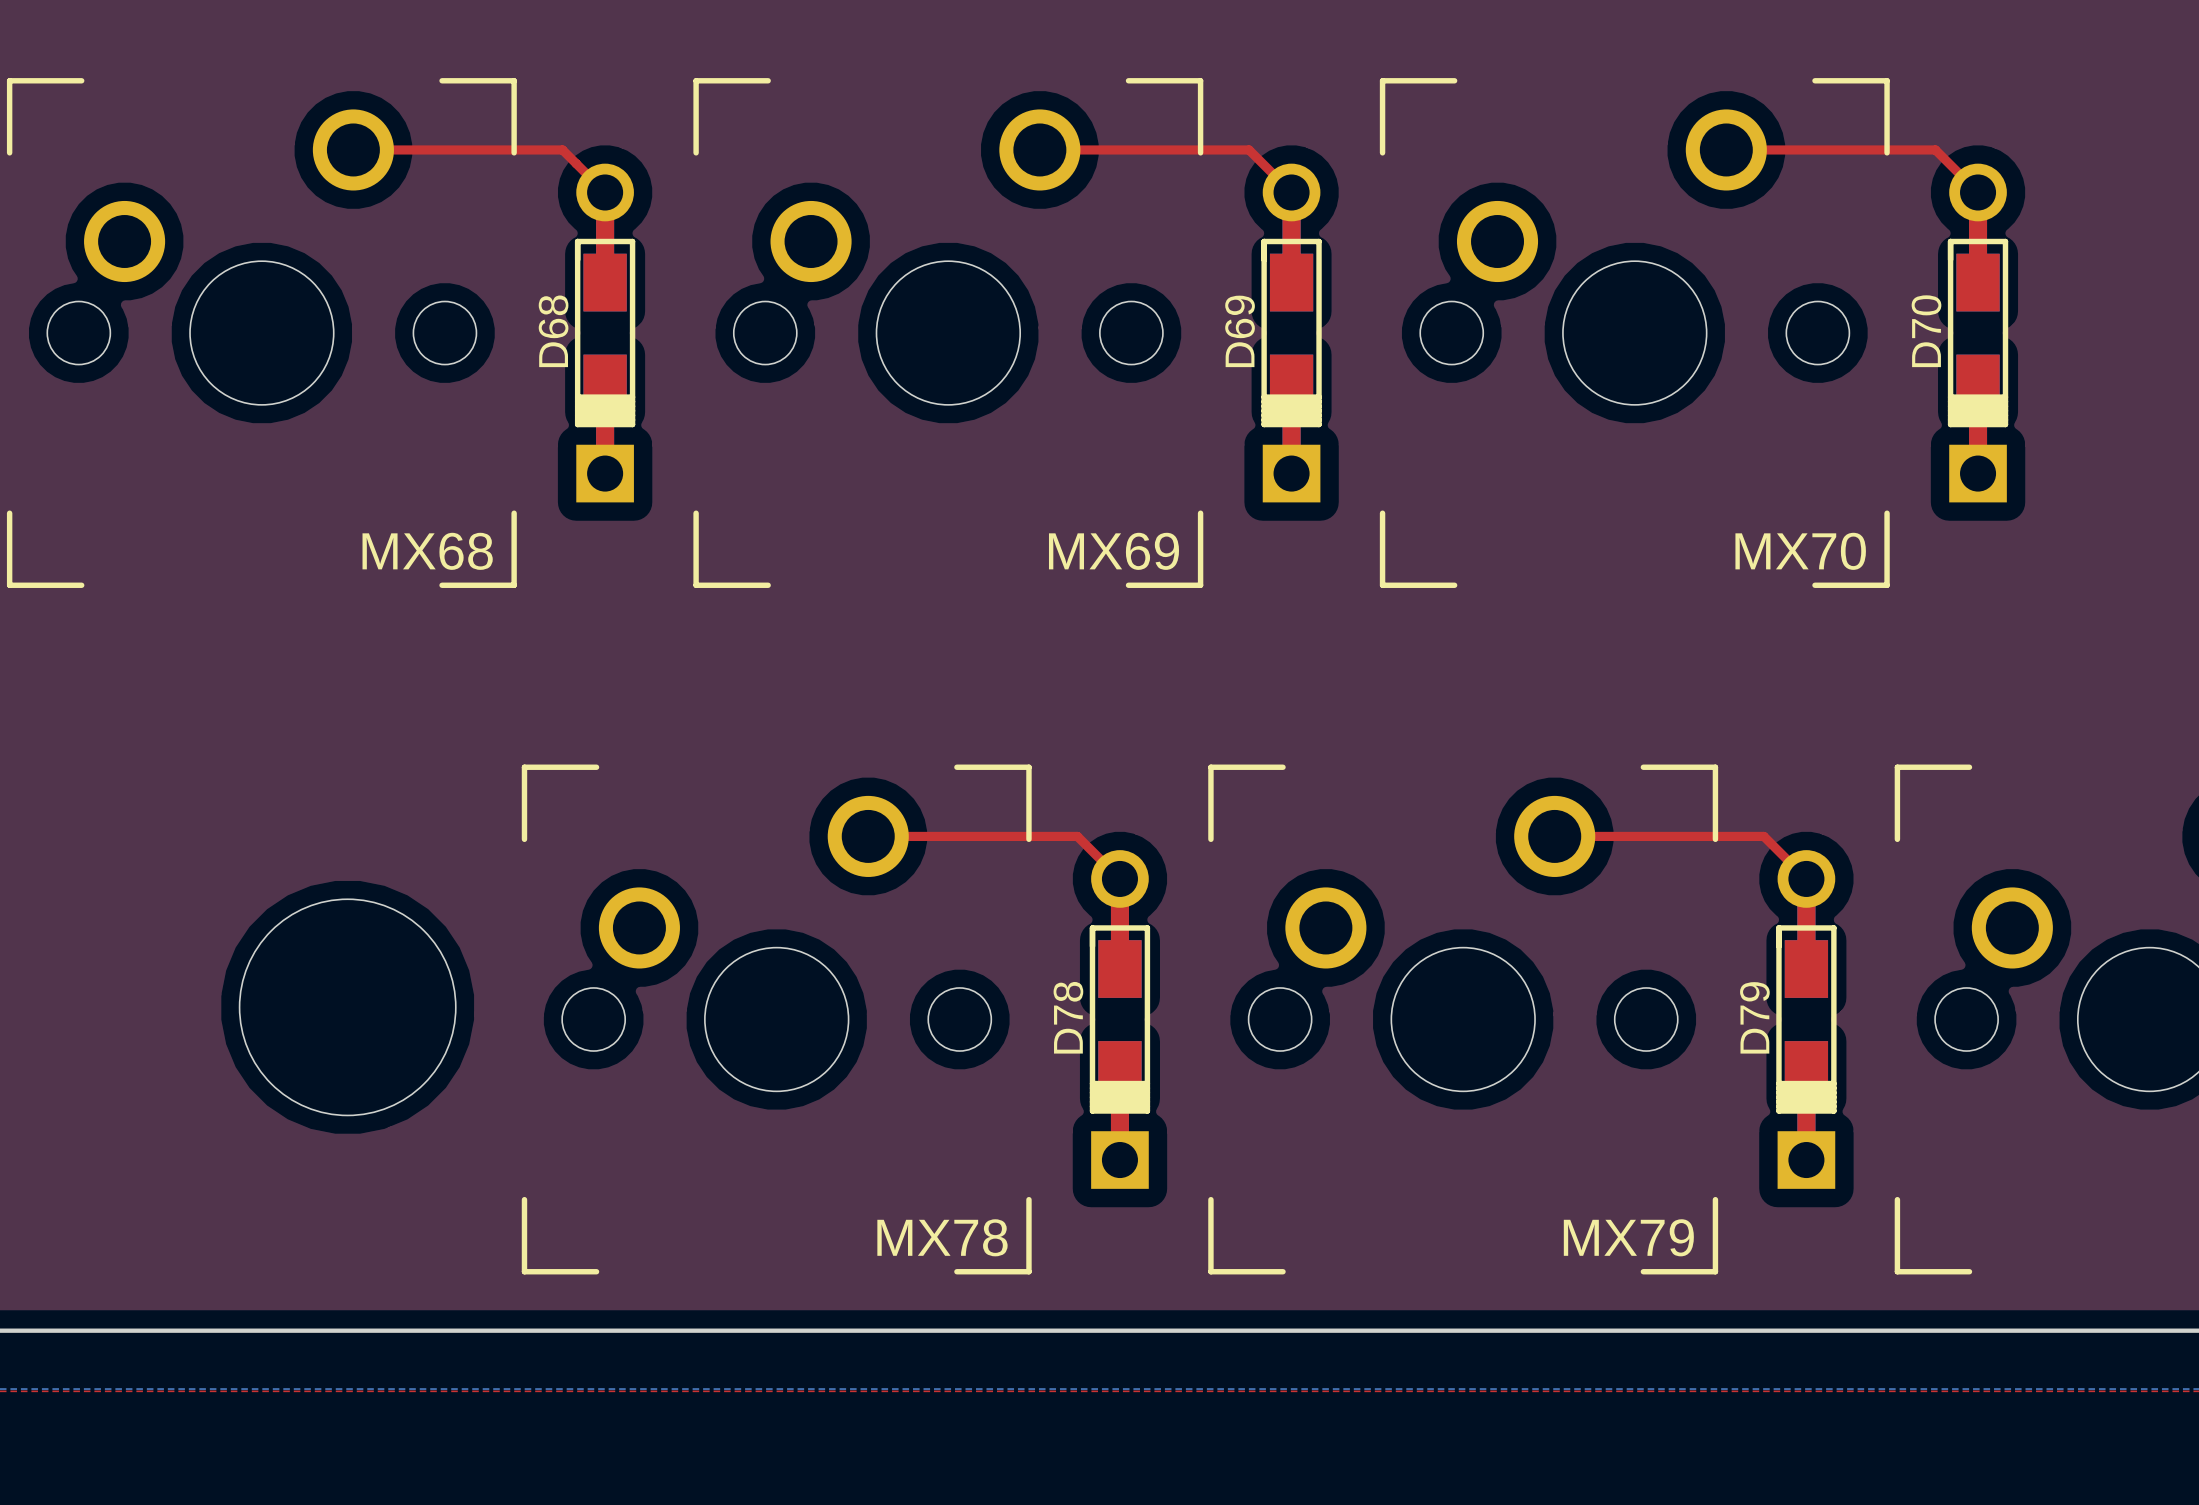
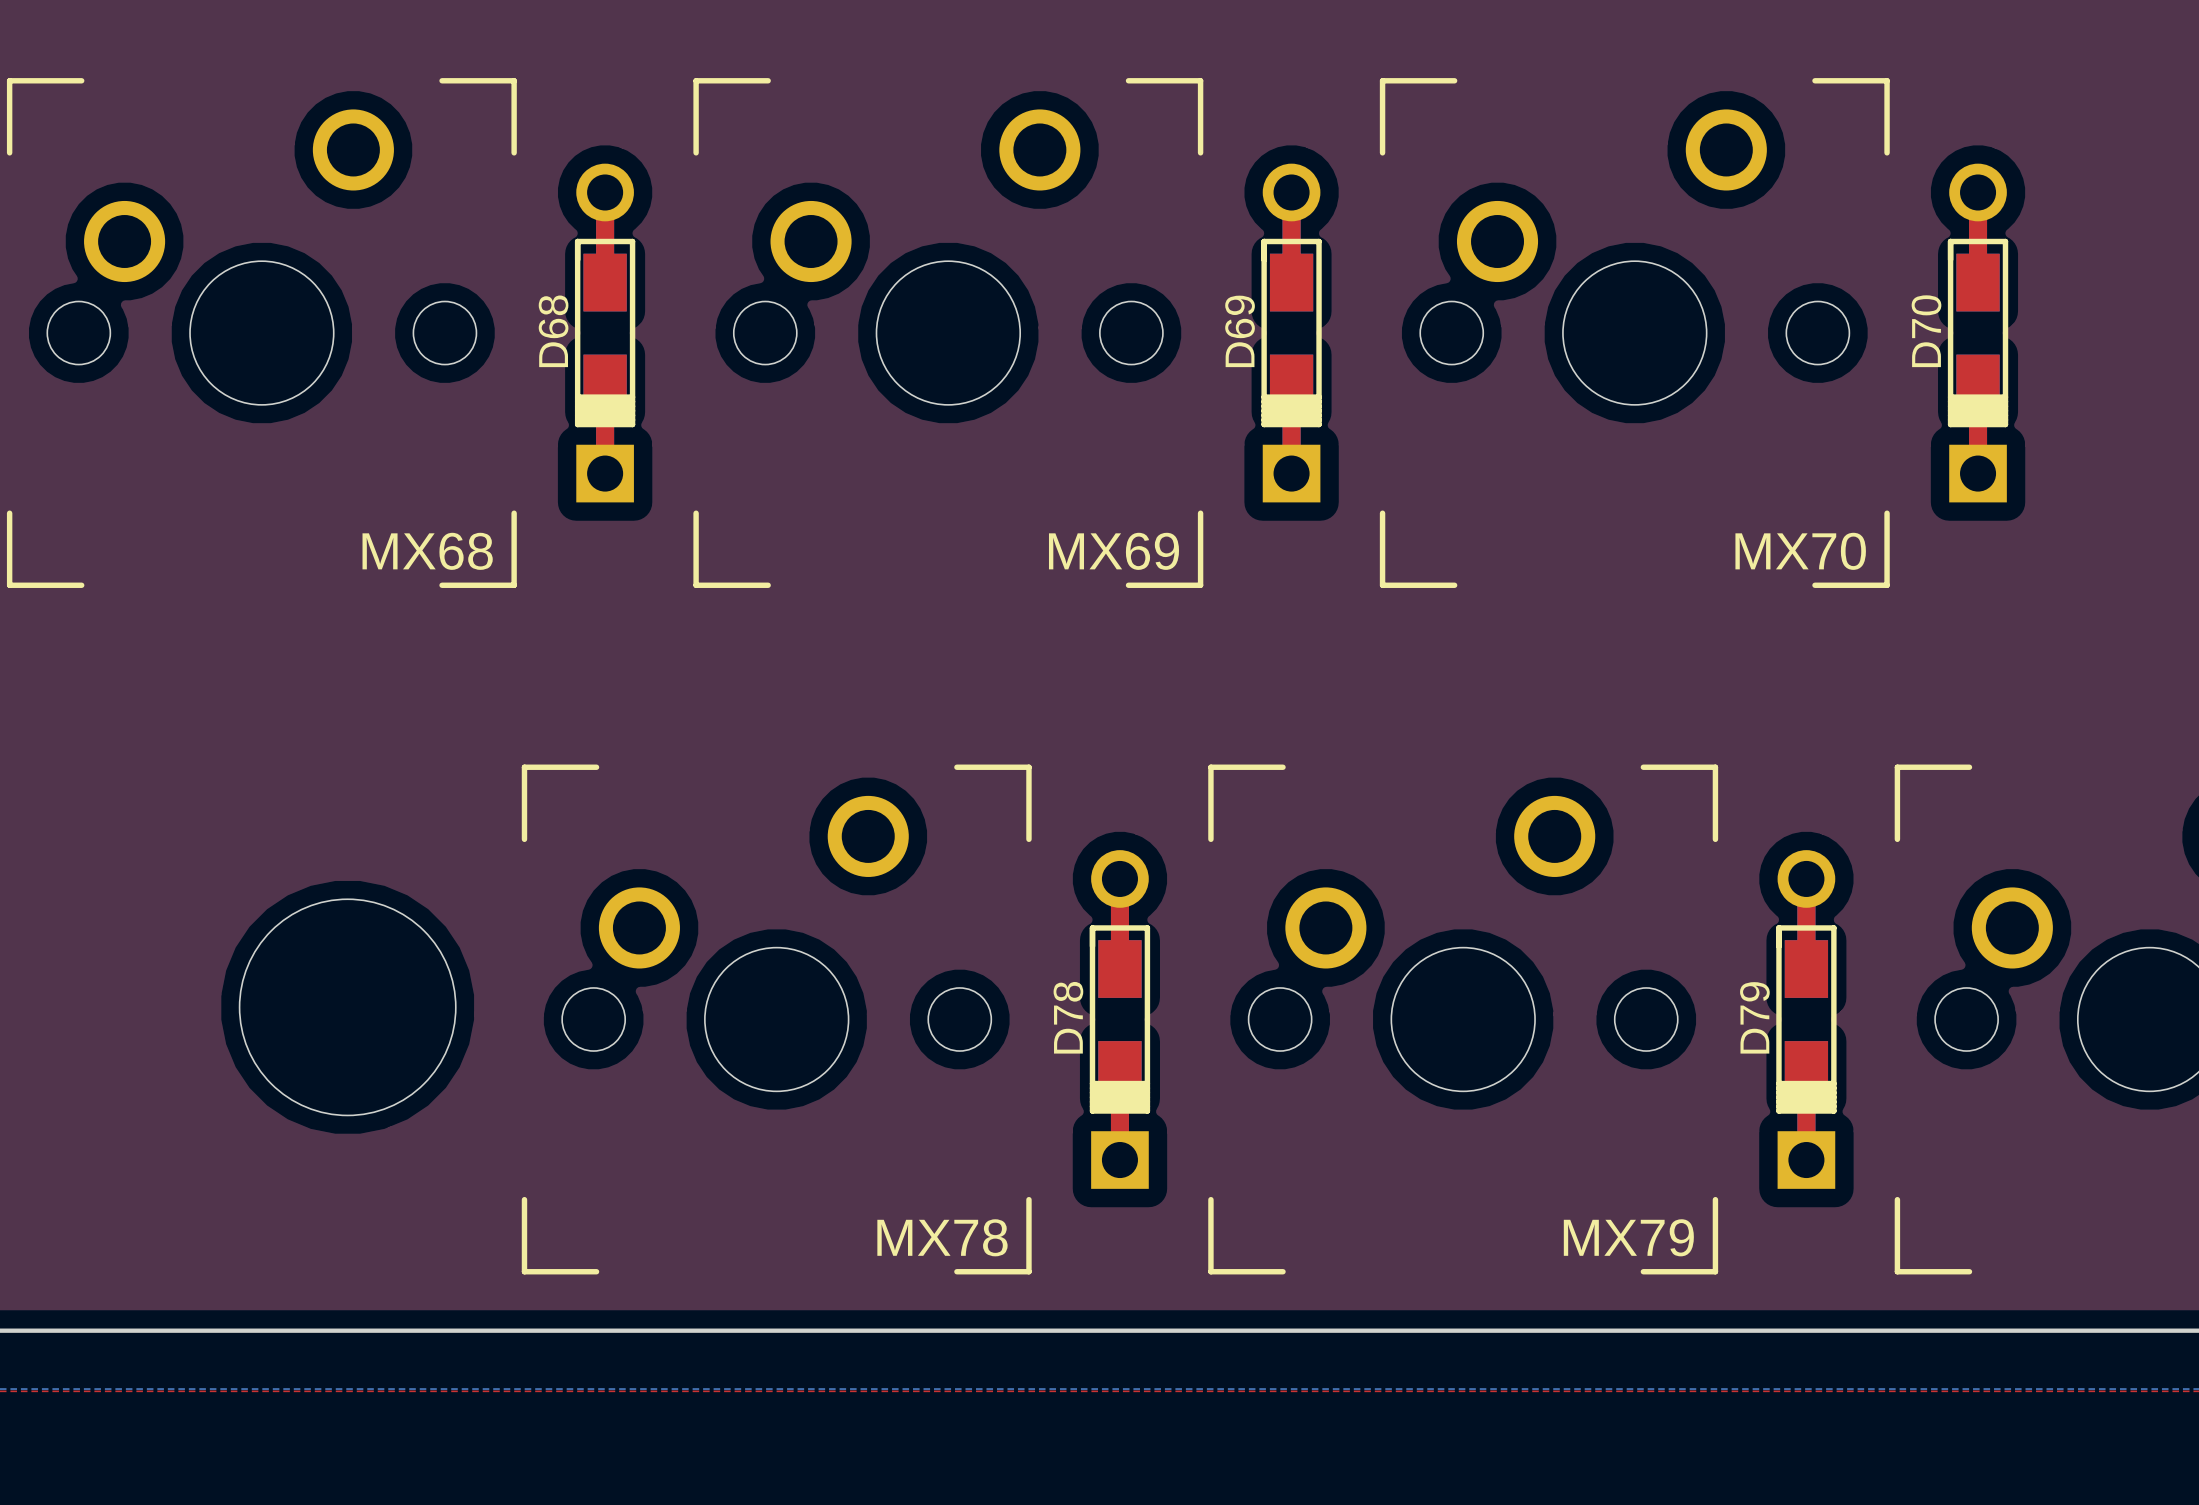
top track: (353, 149) (562, 149) (605, 192) -> none
top track: (1039, 149) (1249, 149) (1291, 192) -> none
top track: (1726, 149) (1935, 149) (1978, 192) -> none
top track: (868, 836) (1077, 836) (1119, 878) -> none
top track: (1554, 836) (1763, 836) (1806, 878) -> none

